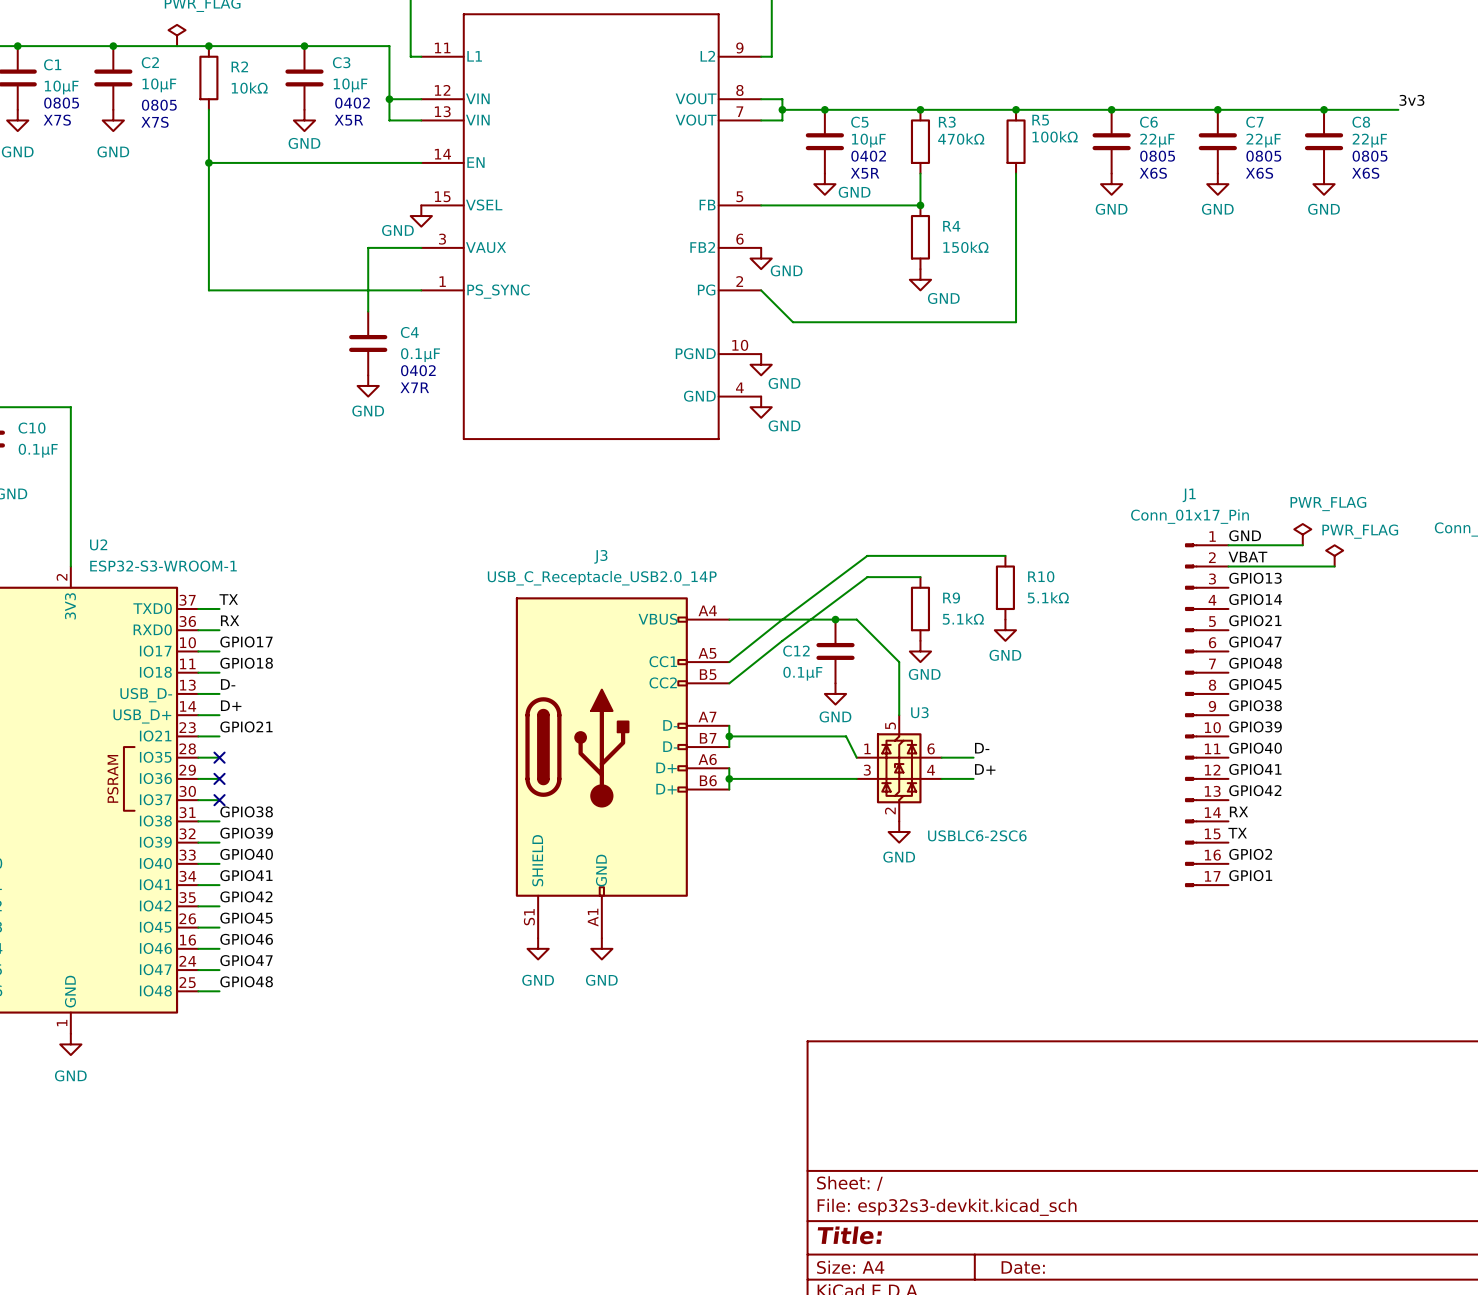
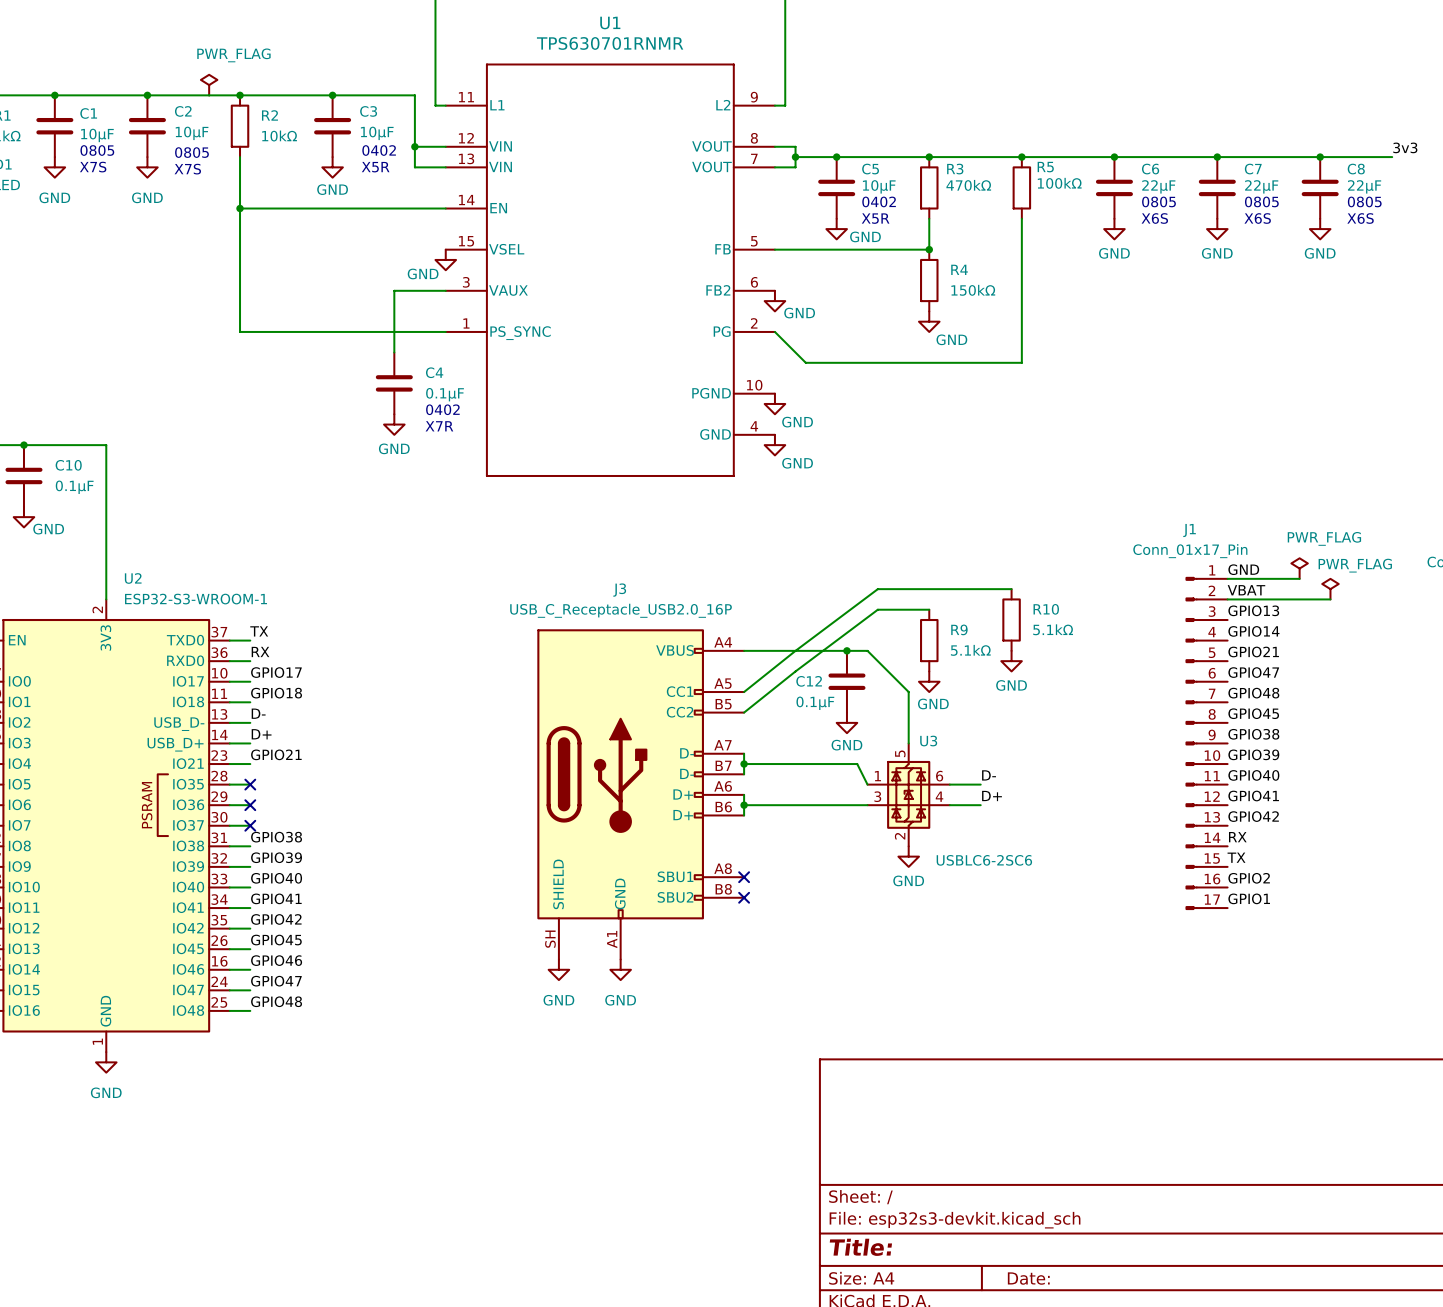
J3 value: USB_C_Receptacle_USB2.0_14P (602, 578) -> USB_C_Receptacle_USB2.0_16P (621, 610)
J3 symbol: [515, 597, 730, 939] -> [537, 629, 745, 960]
no-connect mark: none -> (744, 877)
no-connect mark: none -> (744, 897)

